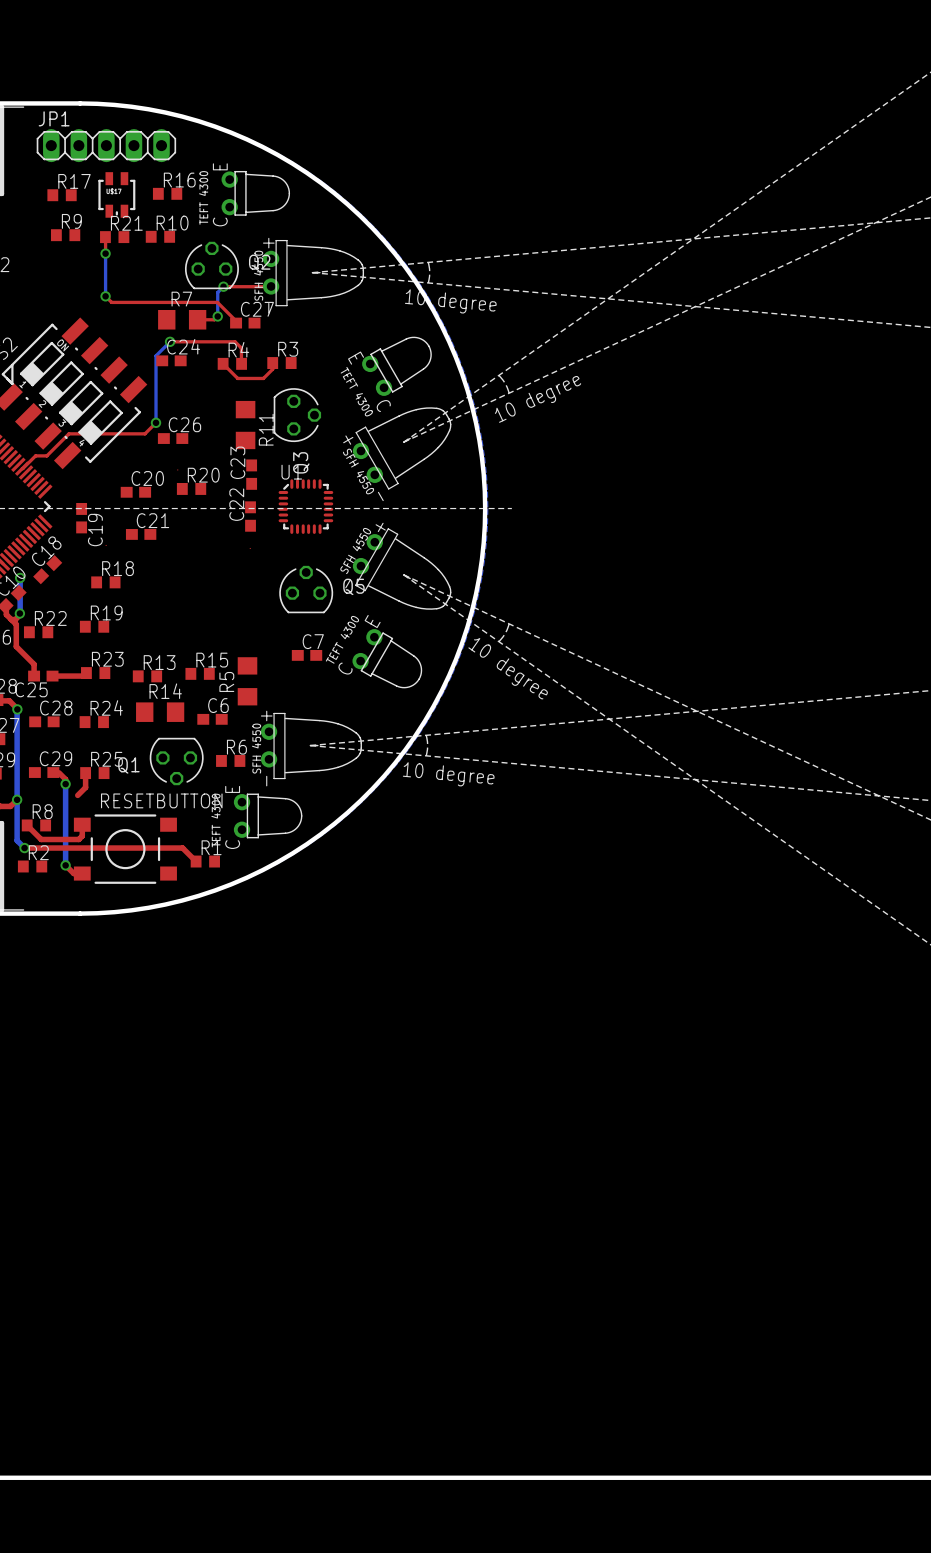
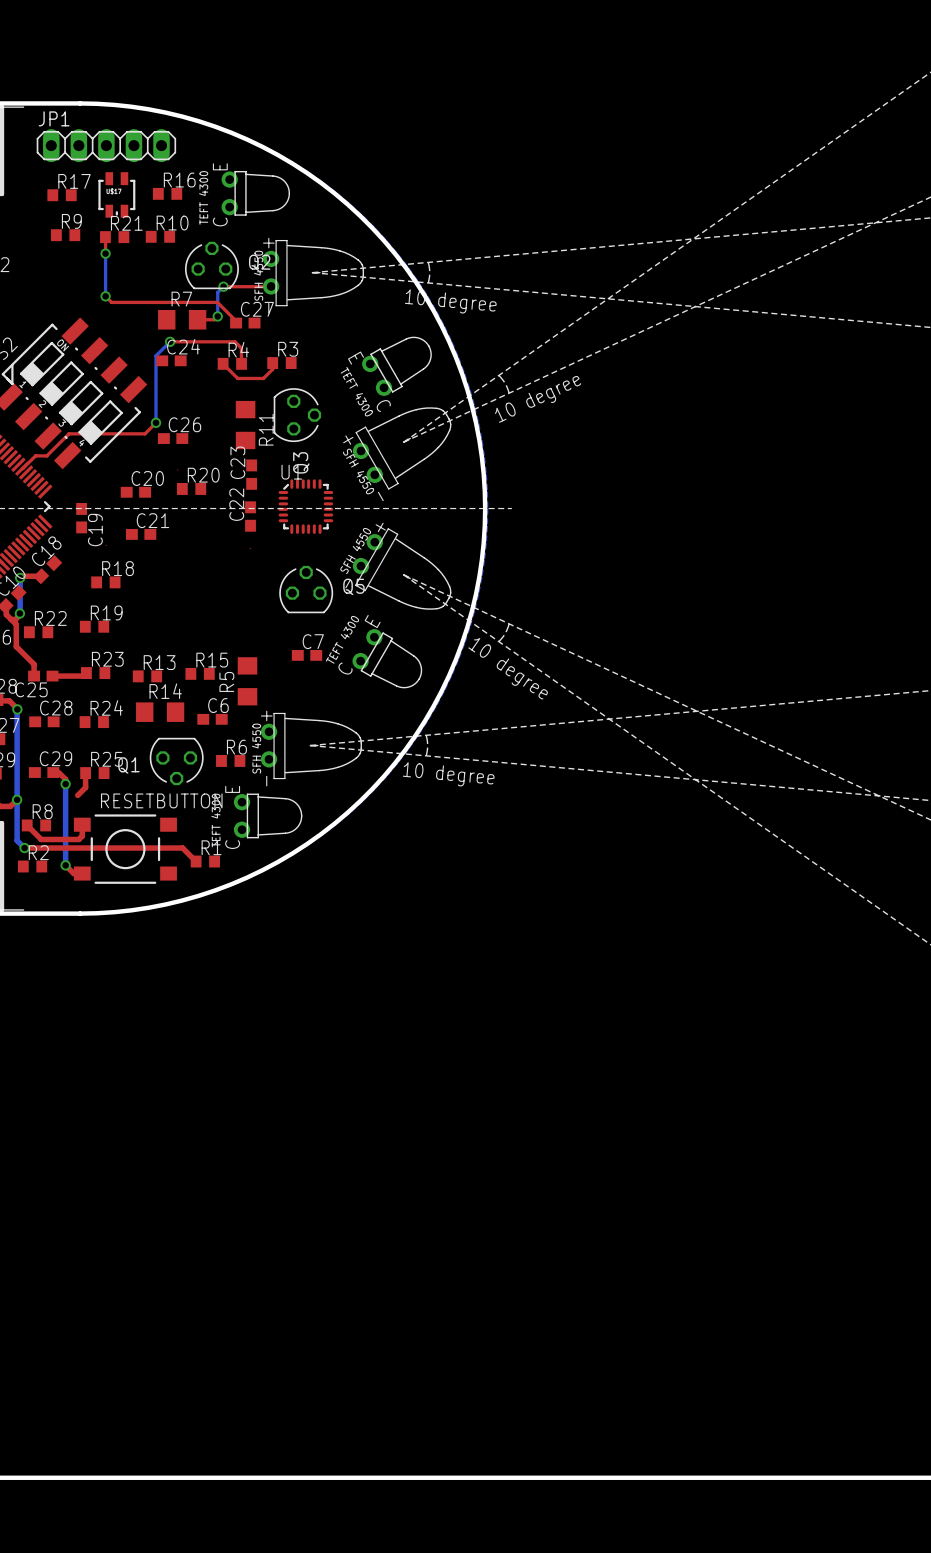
top track: none -> (21, 576) (41, 576)

